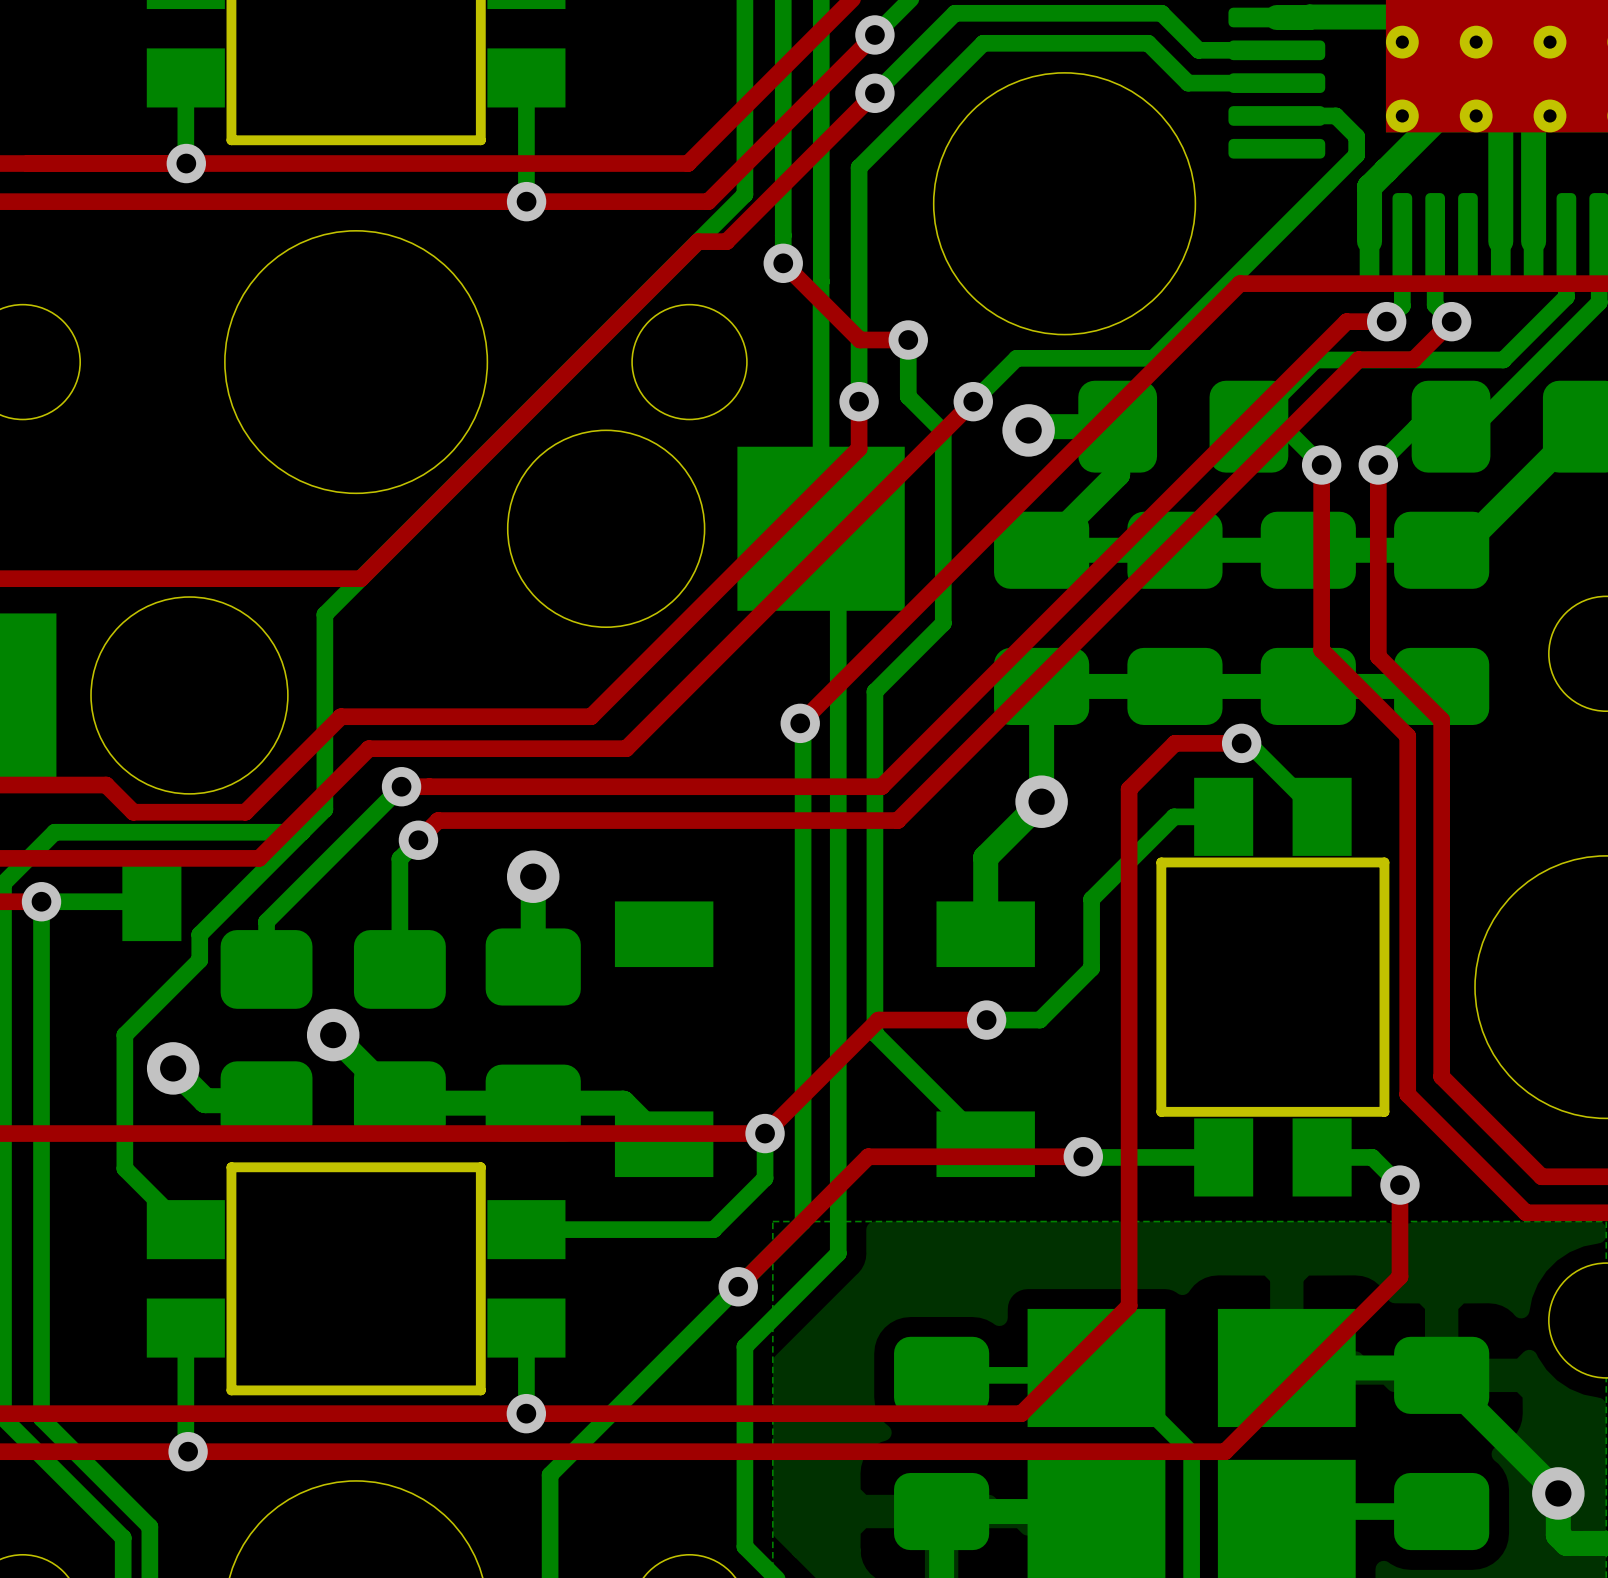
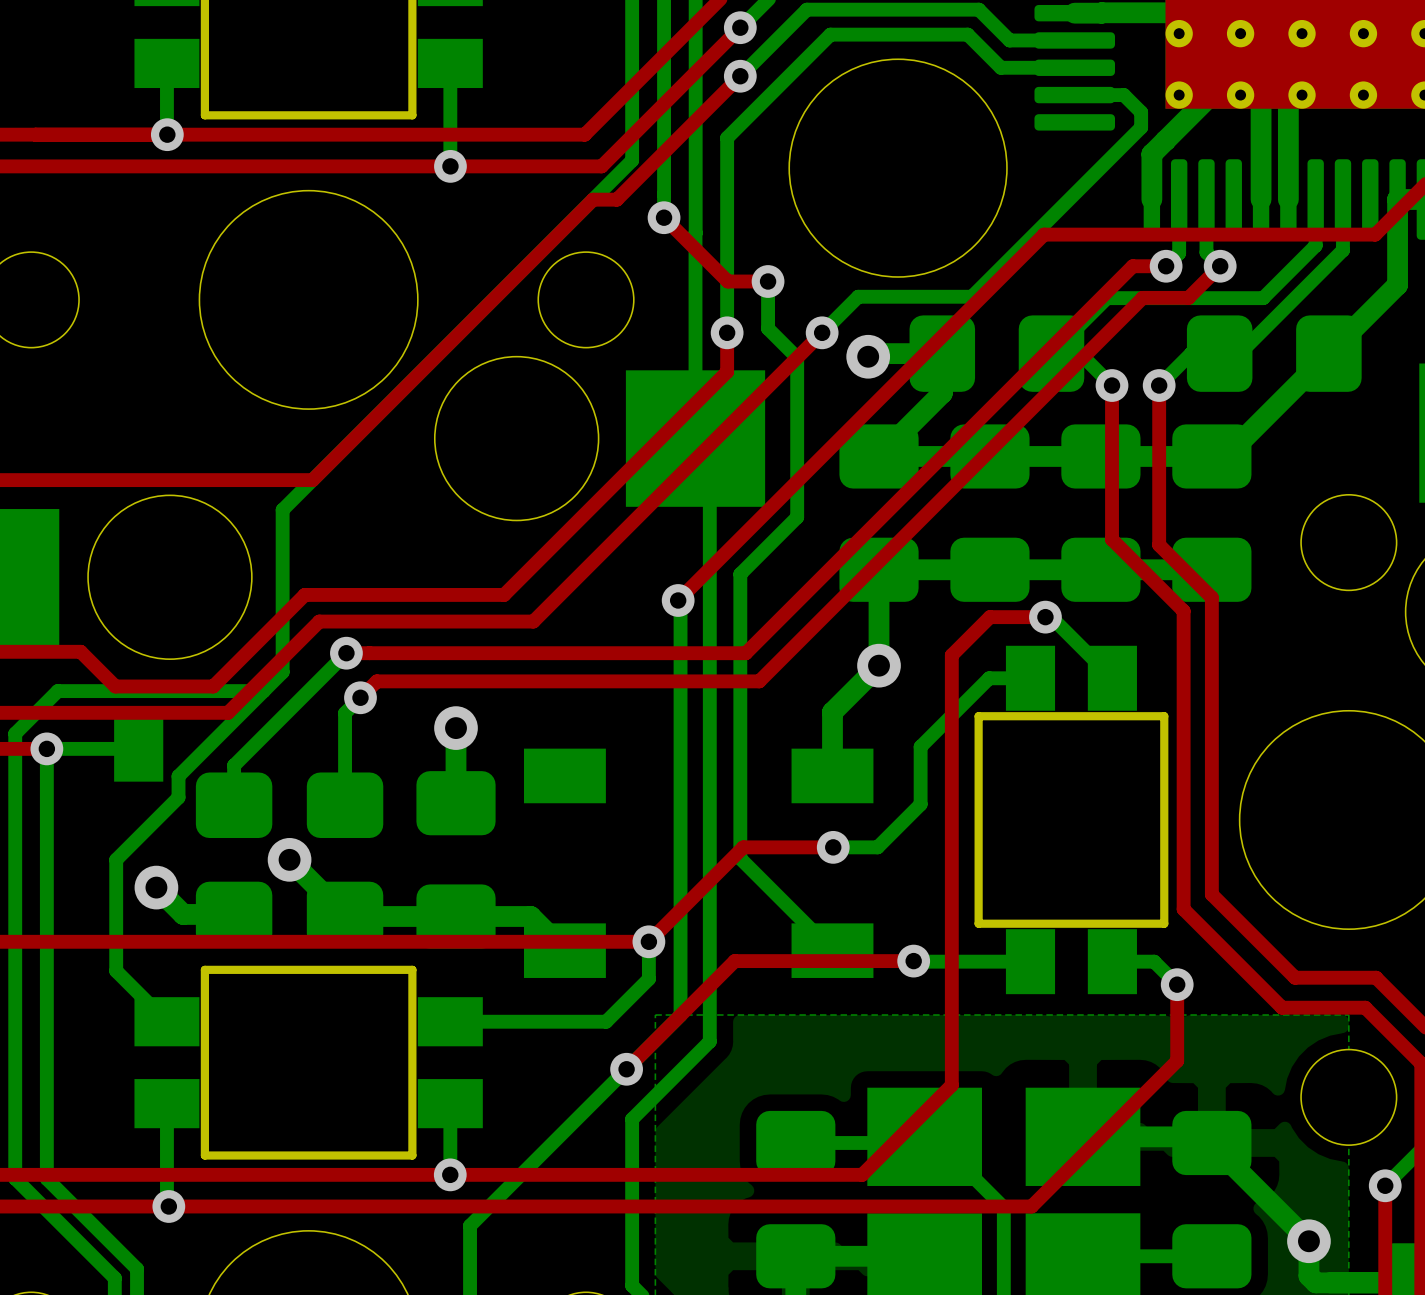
top track: (351, 716) (341, 716) (245, 812) (133, 812) (106, 785) (82, 785) -> (304, 594) (213, 686) (115, 686) (80, 651)

